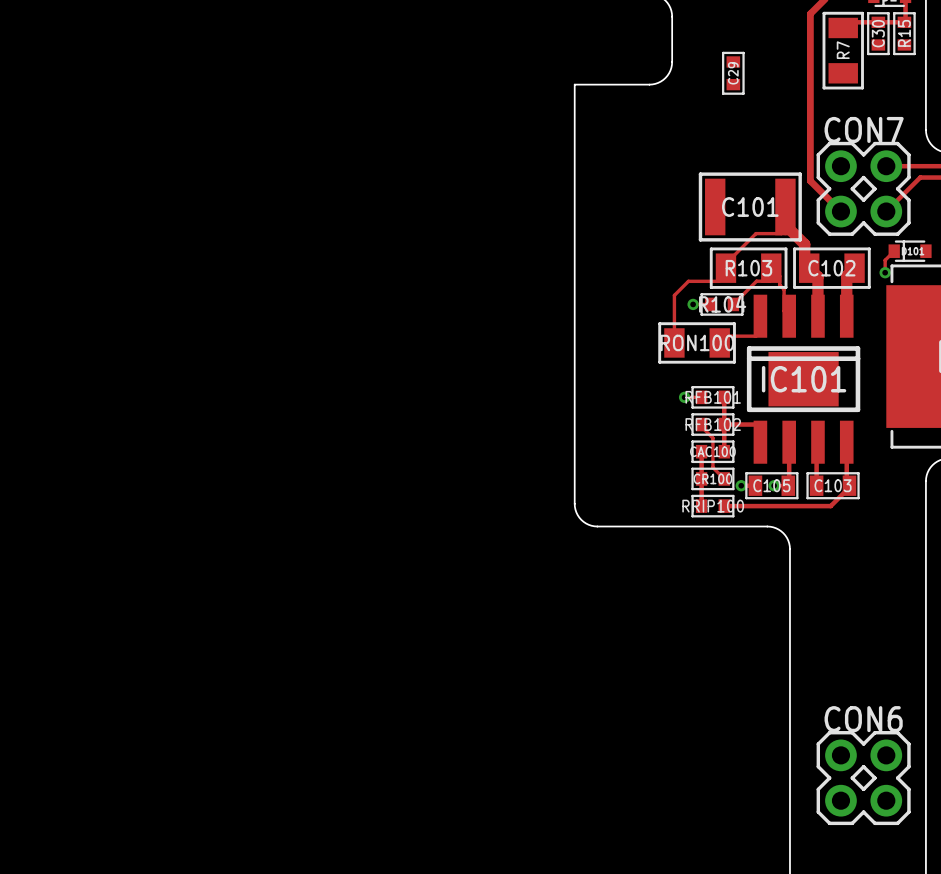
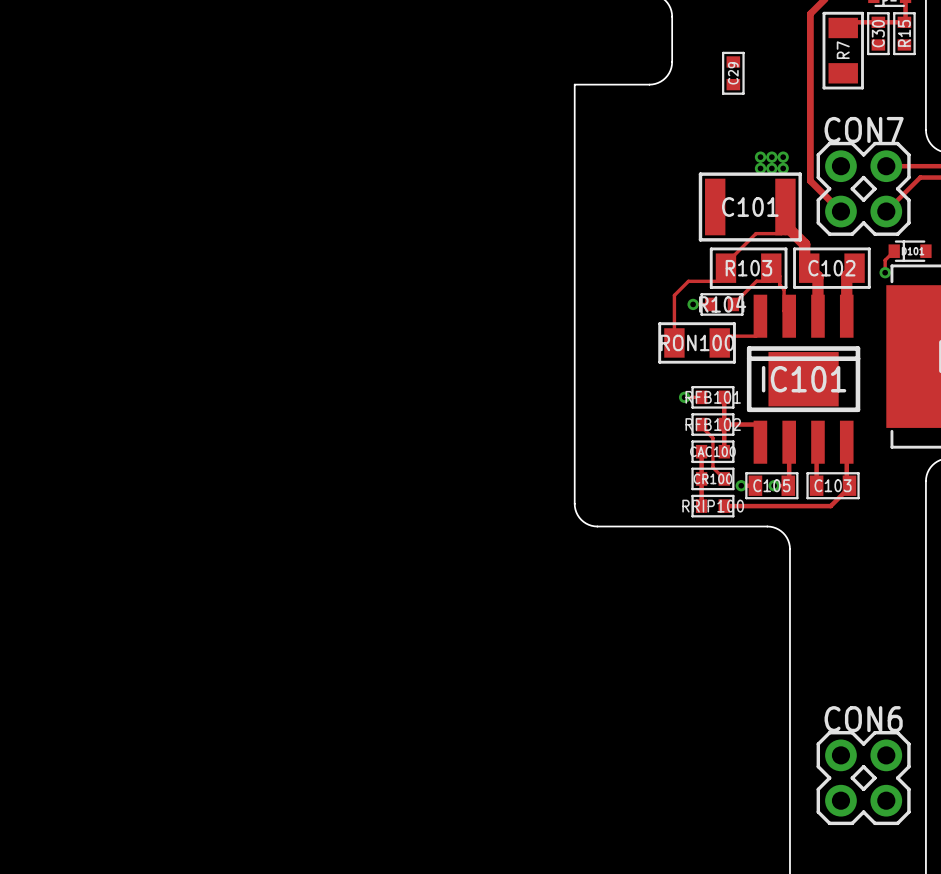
via: none -> (760, 157)
via: none -> (771, 157)
via: none -> (783, 157)
via: none -> (760, 168)
via: none -> (771, 168)
via: none -> (783, 168)

